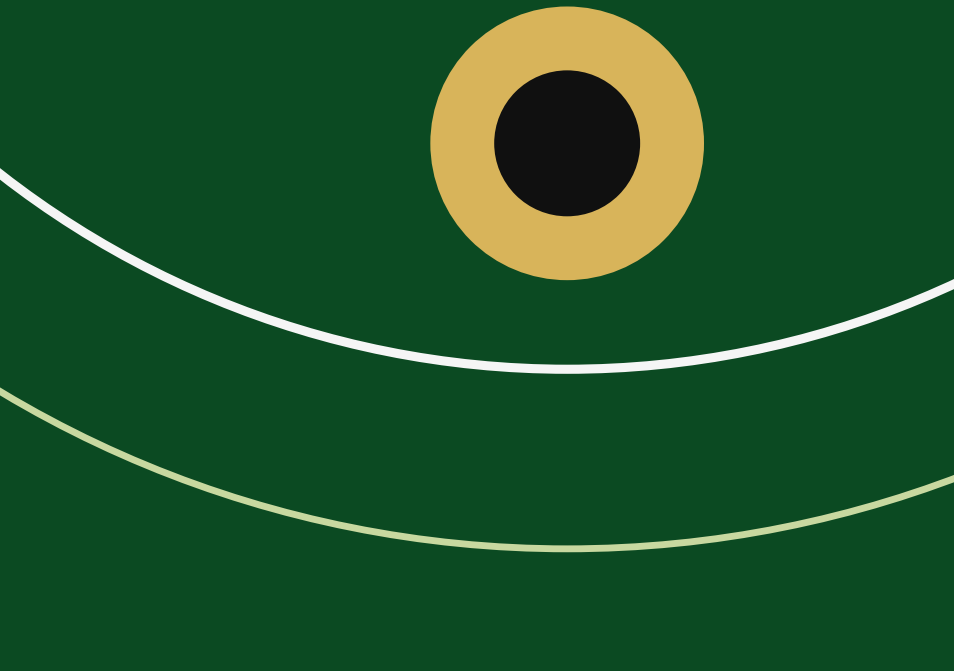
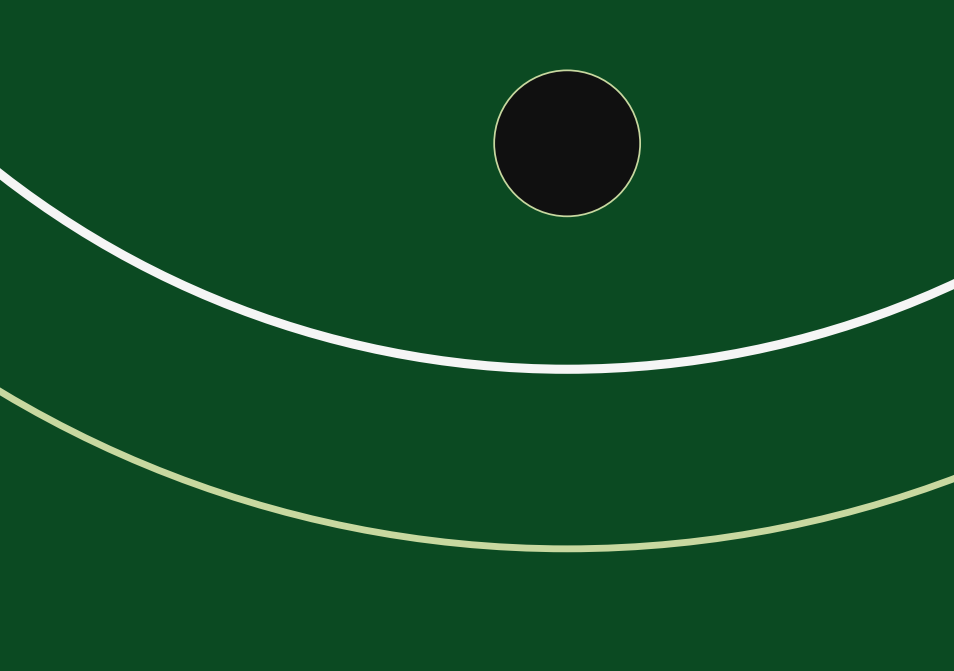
part footprint: [430, 6, 705, 281] -> [494, 70, 641, 217]

